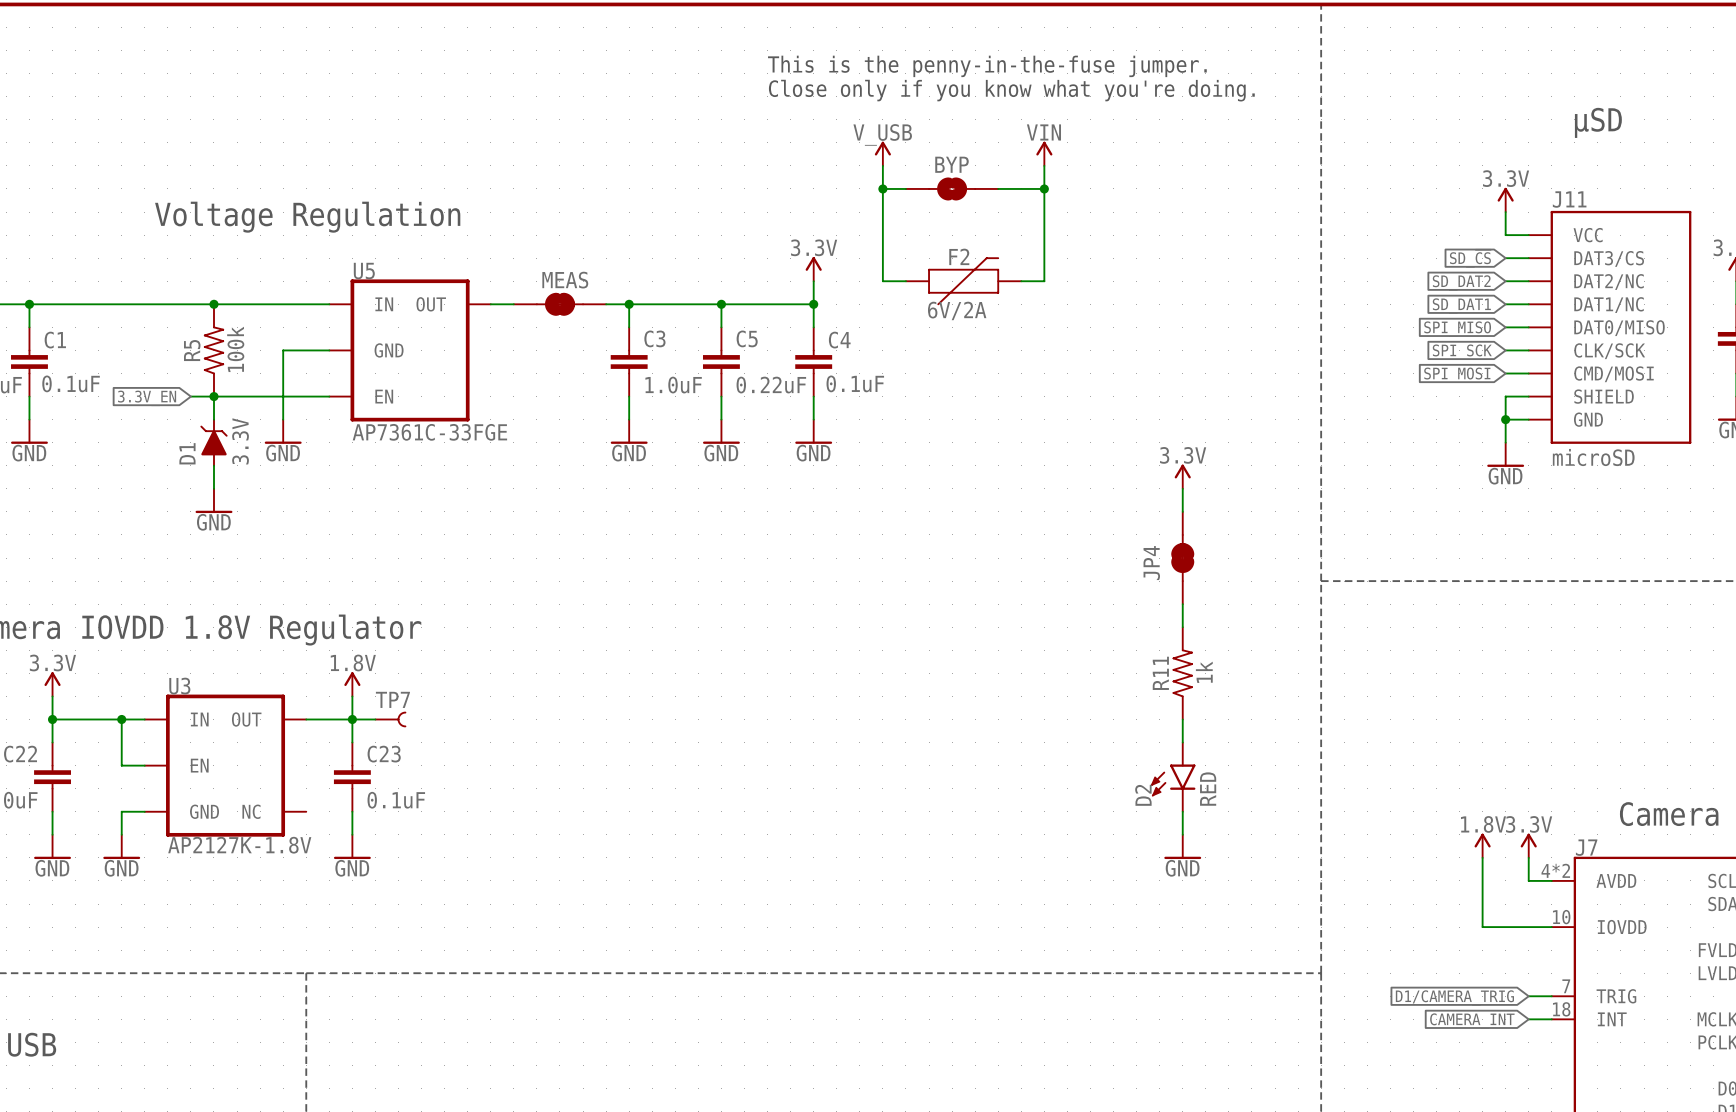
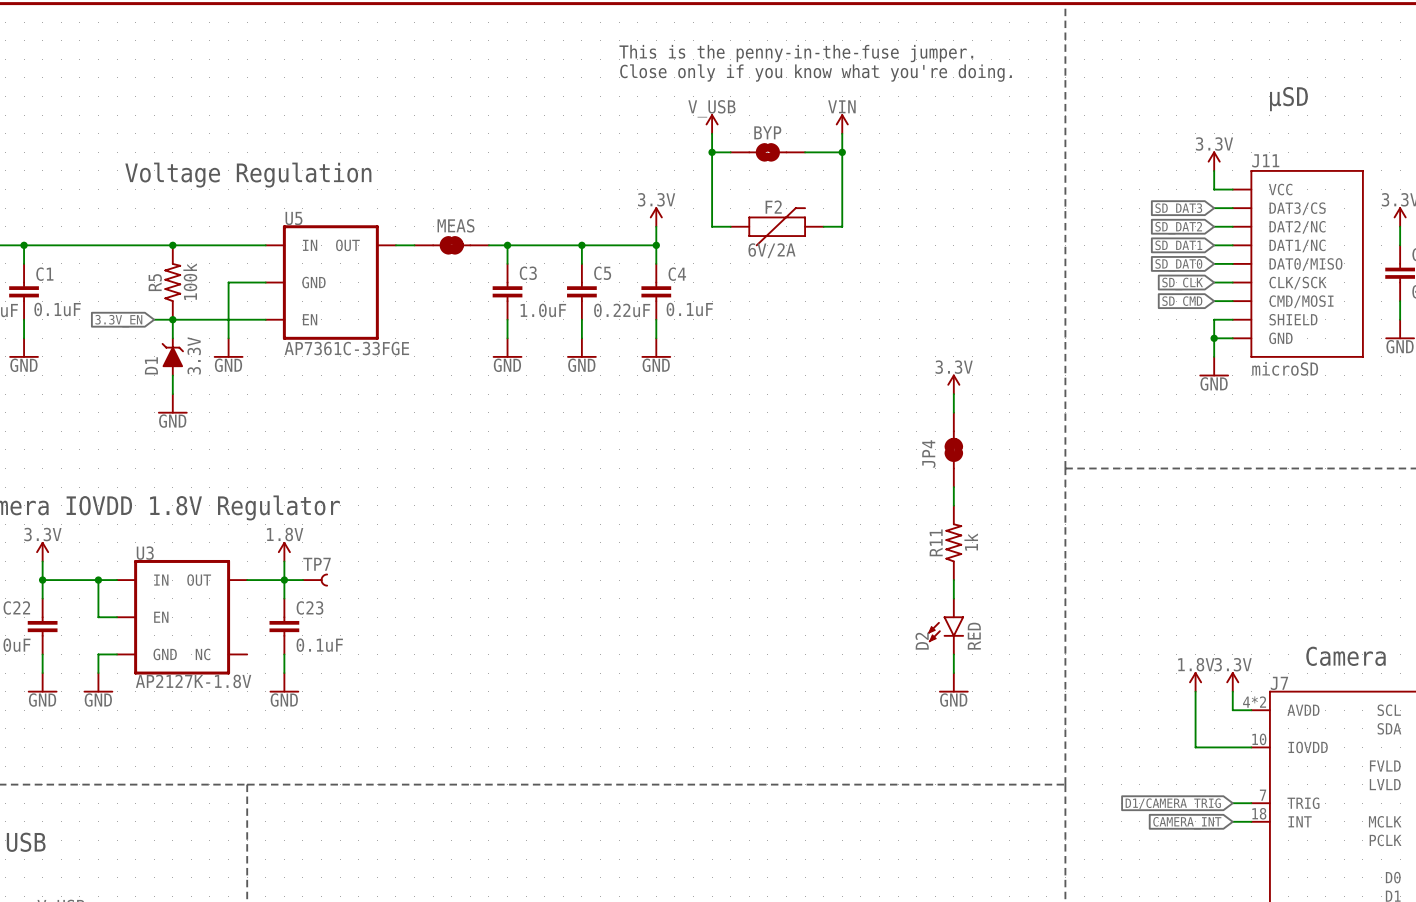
global label: SD_~{CS} (1470, 258) -> SD_DAT3 (1178, 209)
global label: SPI_MISO (1457, 329) -> SD_DAT0 (1178, 265)
global label: SPI_SCK (1462, 352) -> SD_CLK (1182, 283)
global label: SPI_MOSI (1457, 375) -> SD_CMD (1182, 302)

